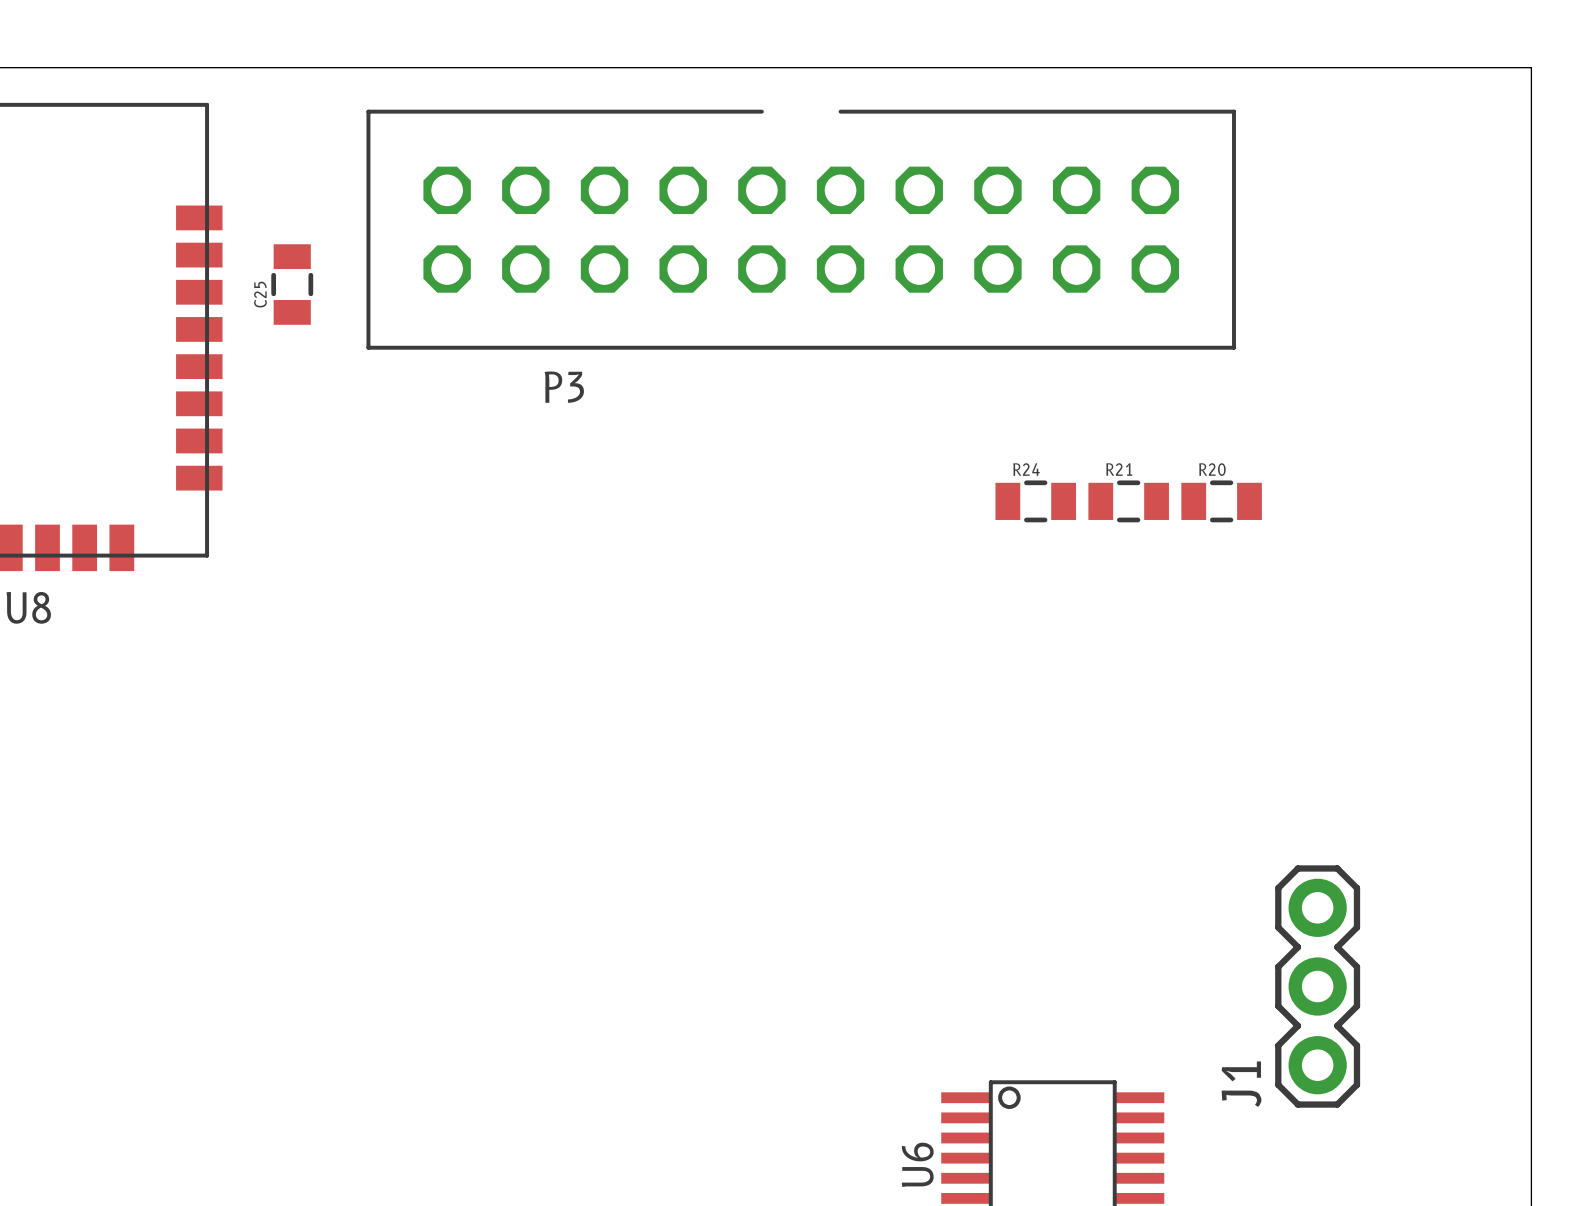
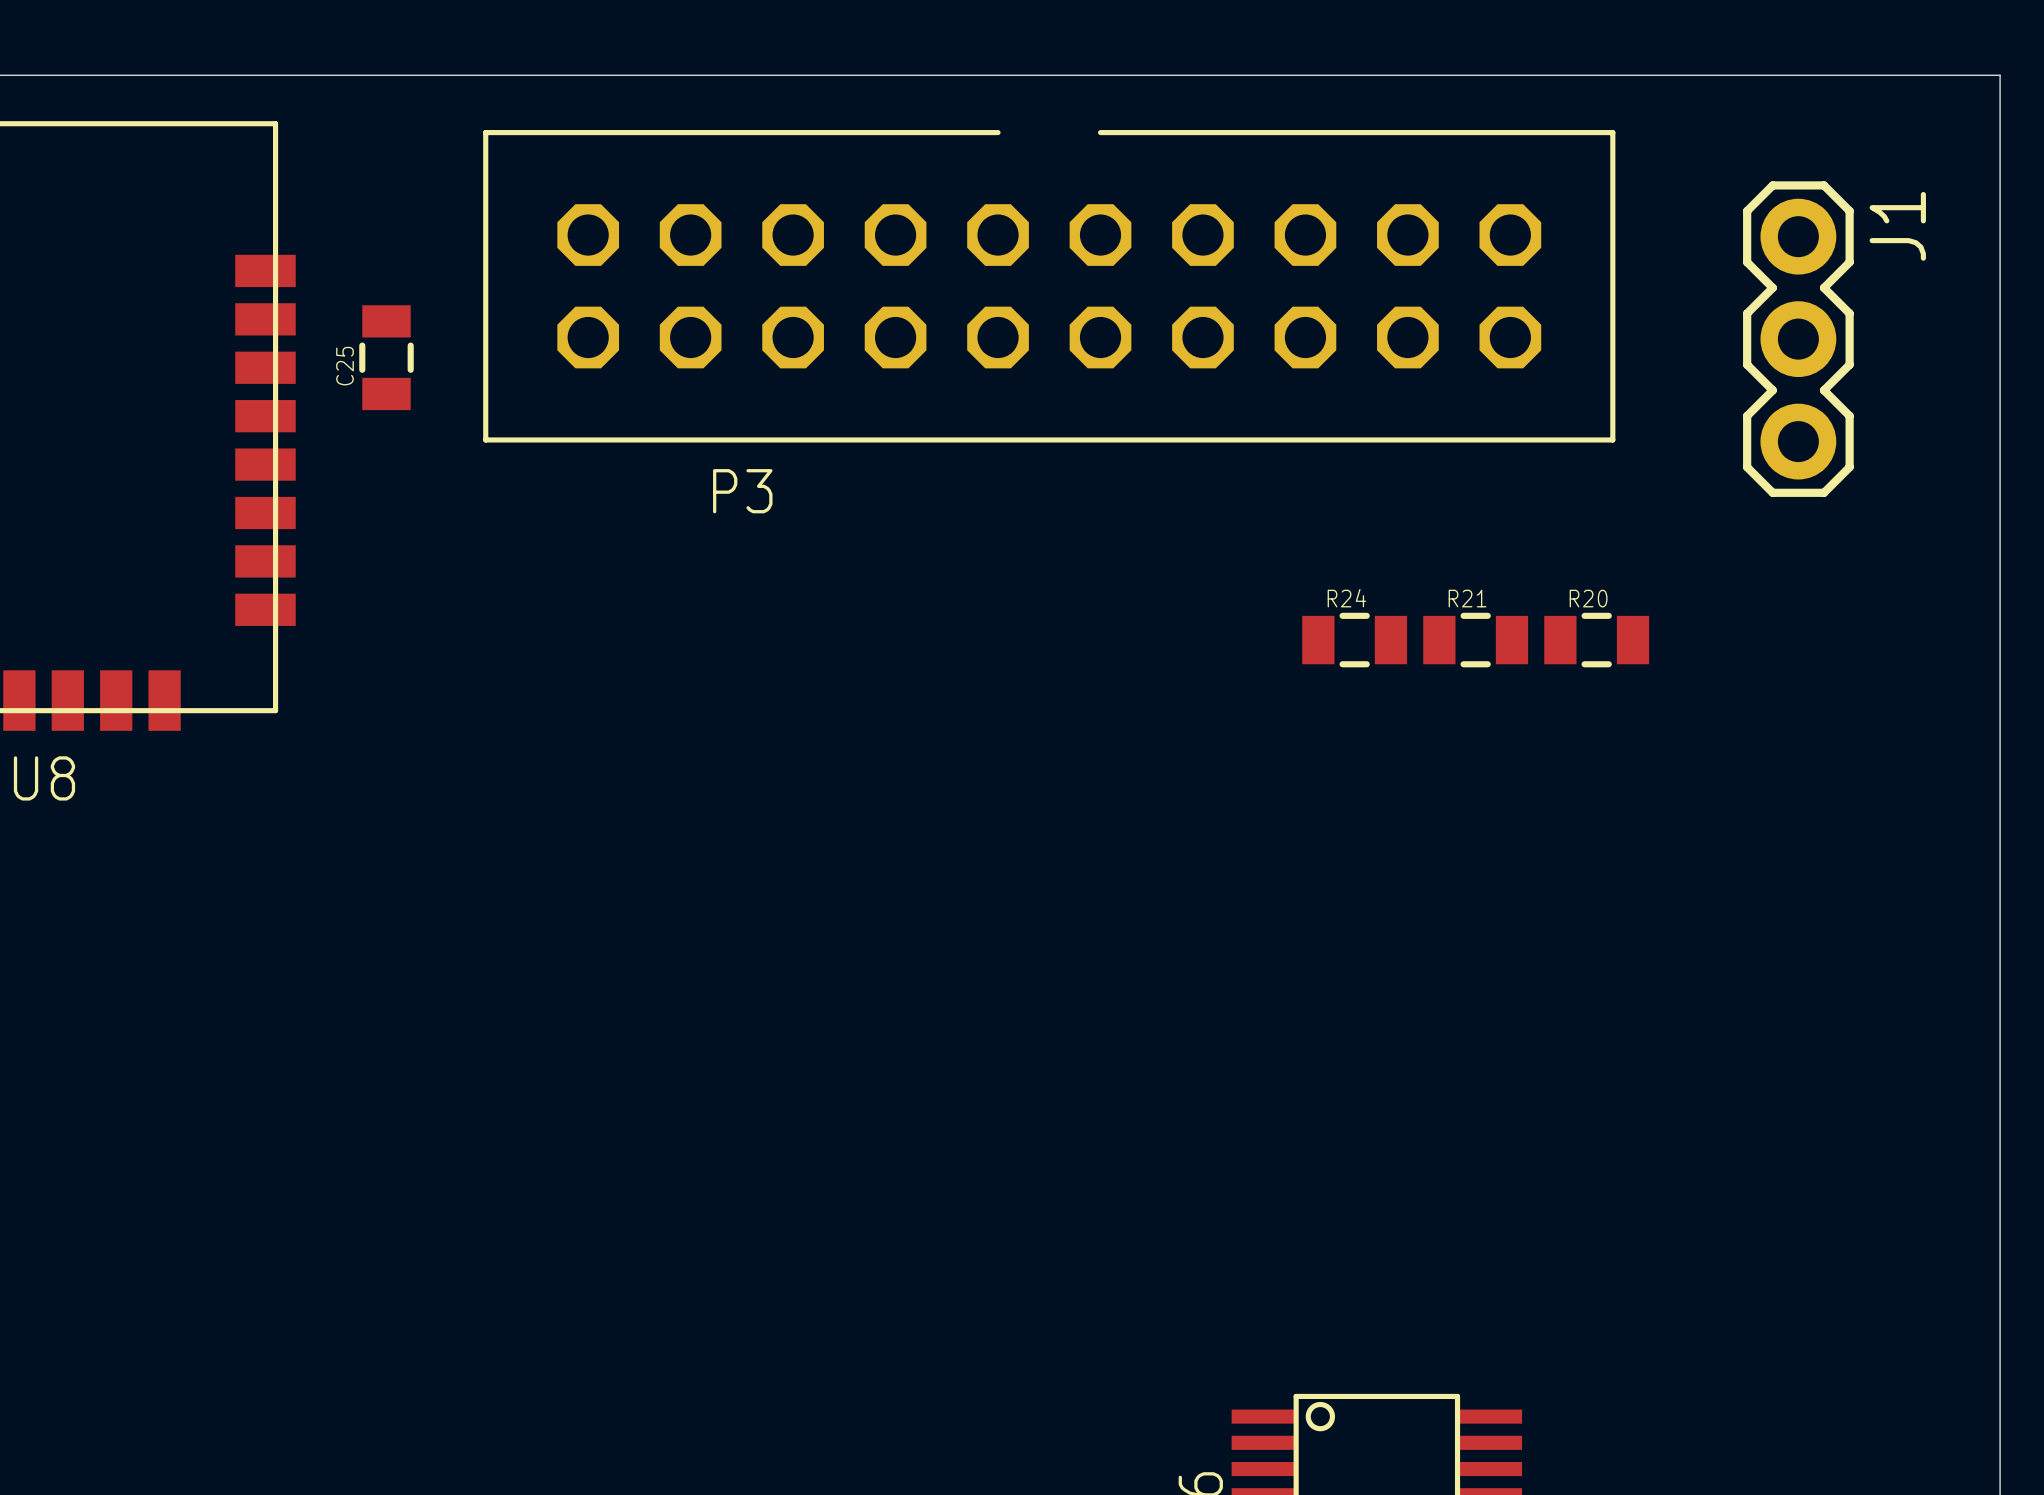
J1 position: (1317, 986) -> (1798, 339)
J1 name position: J1 (1241, 1084) -> J1 (1897, 226)

